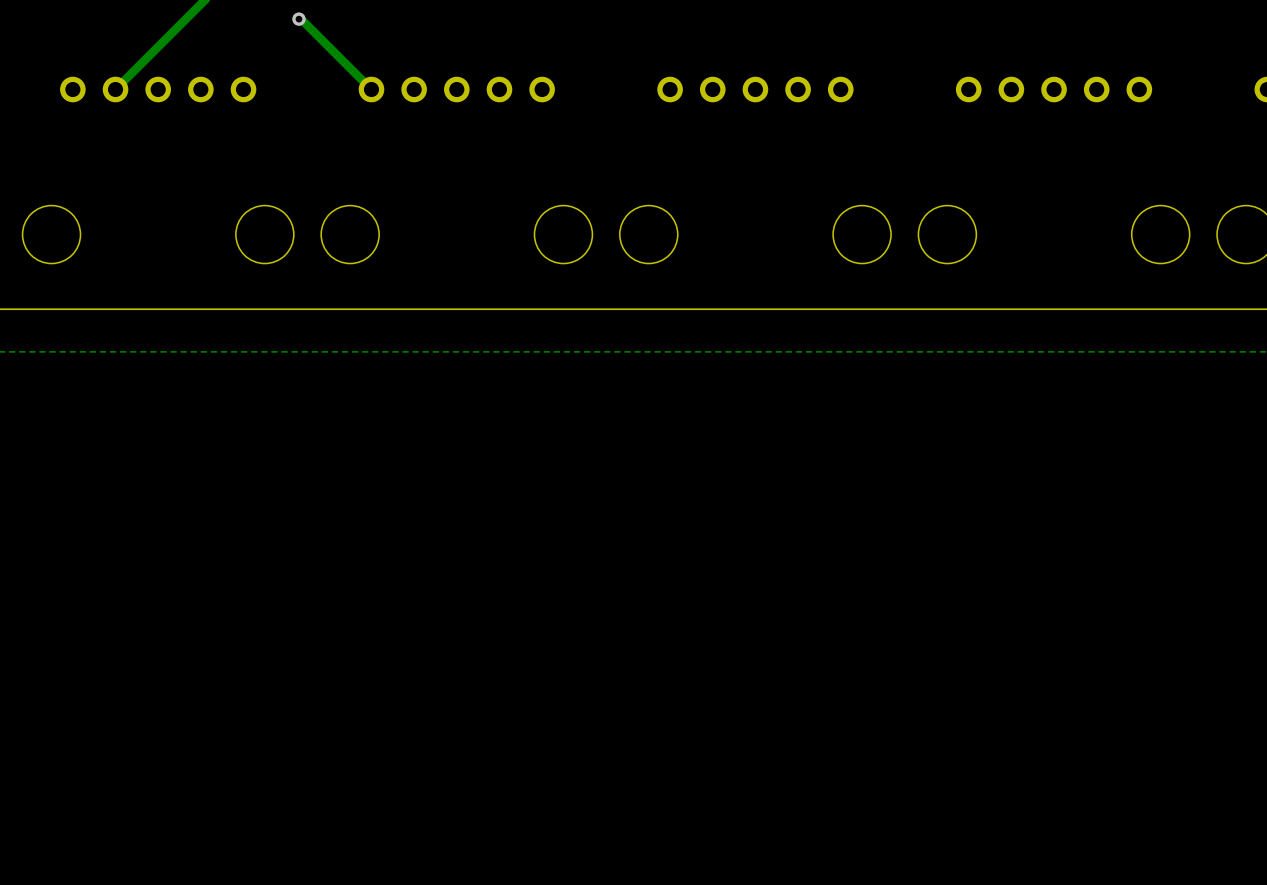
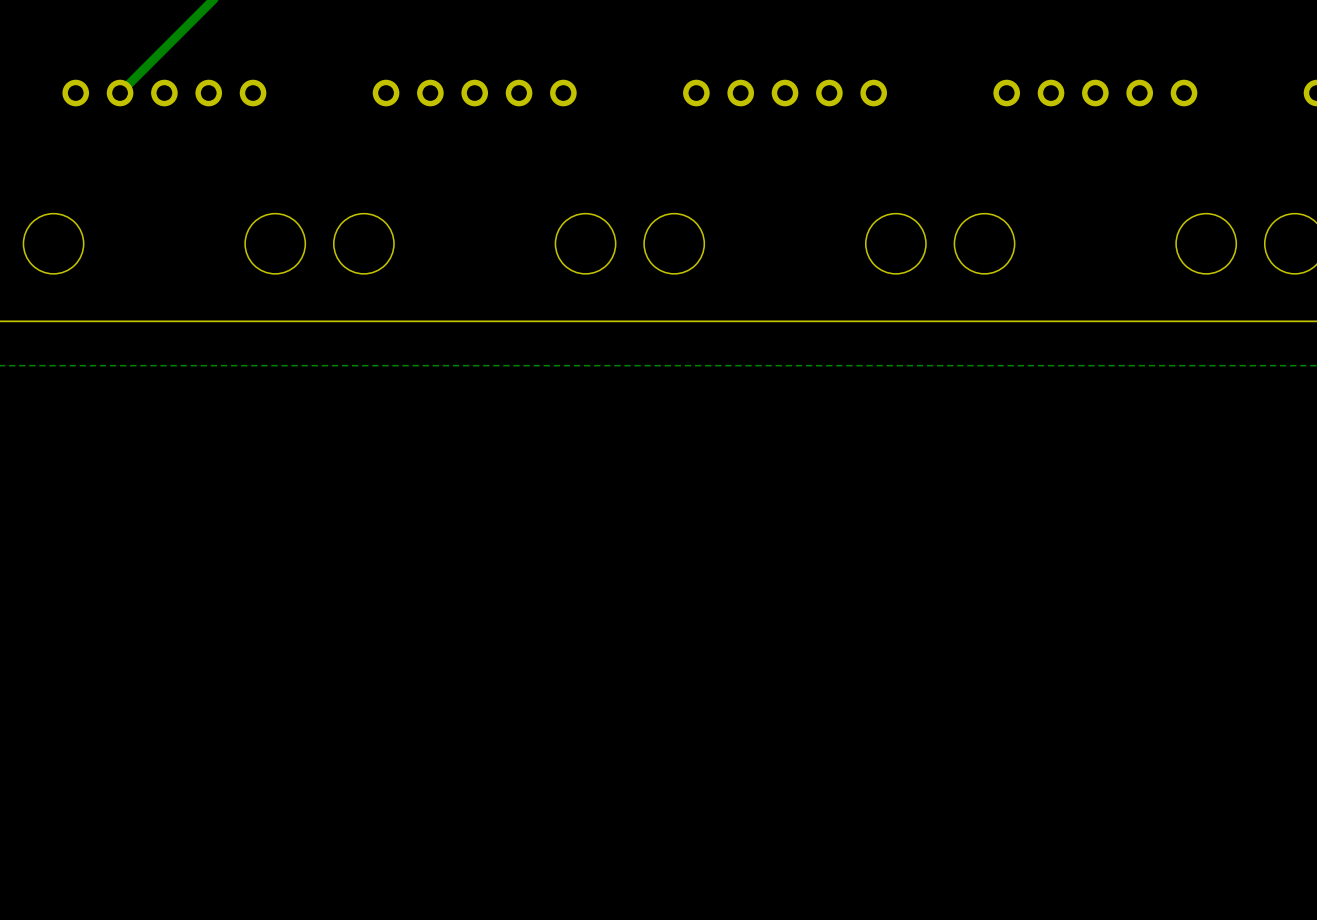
track: (298, 19) (371, 89) -> none
via: (298, 19) -> none

